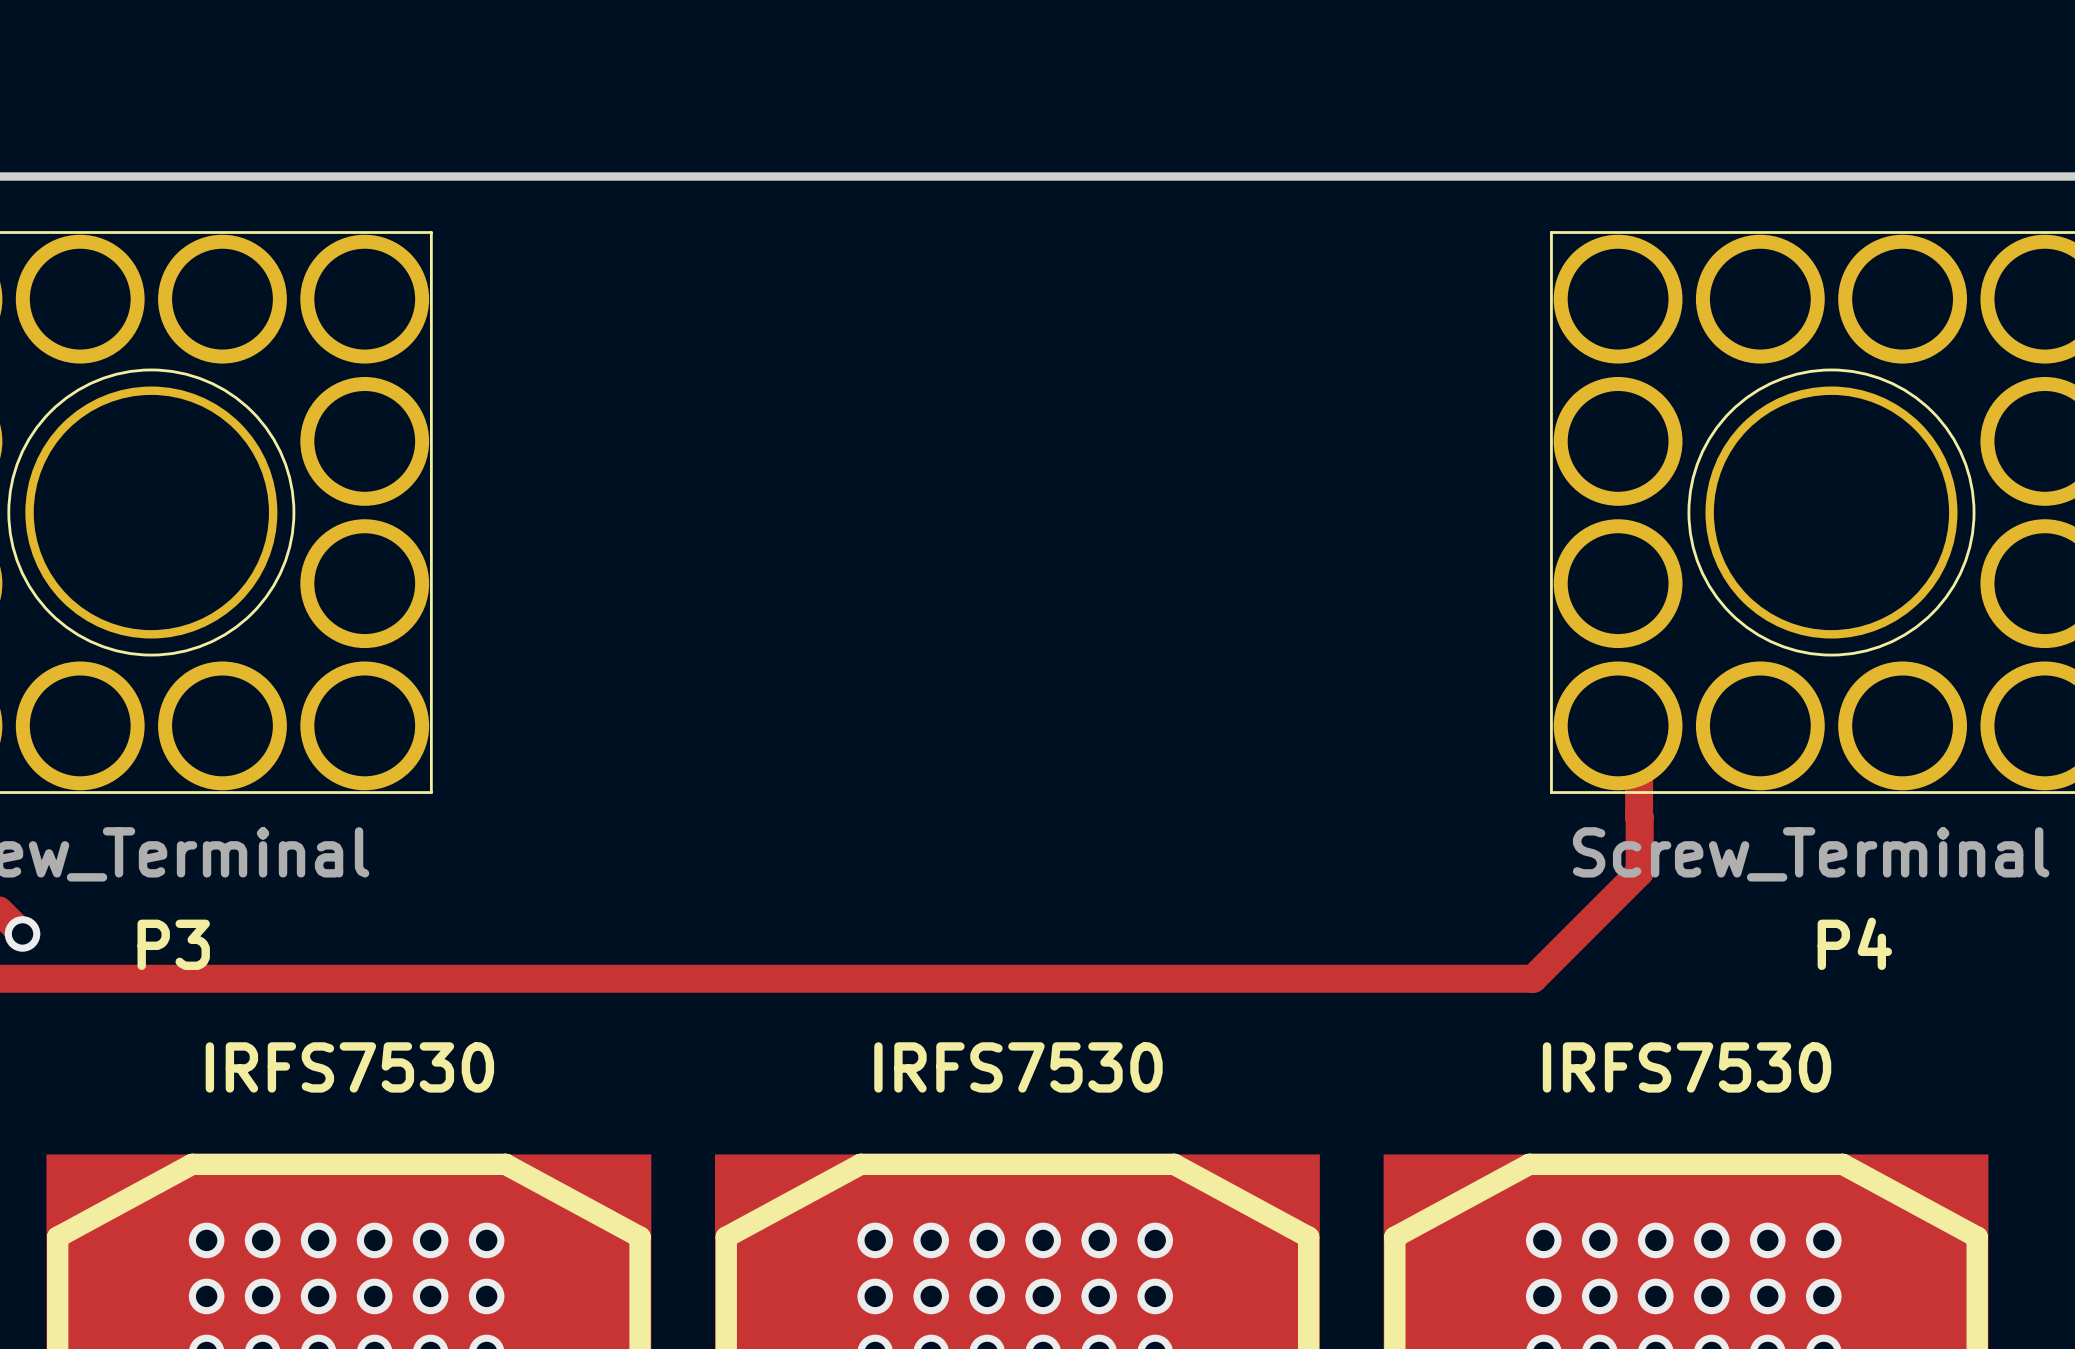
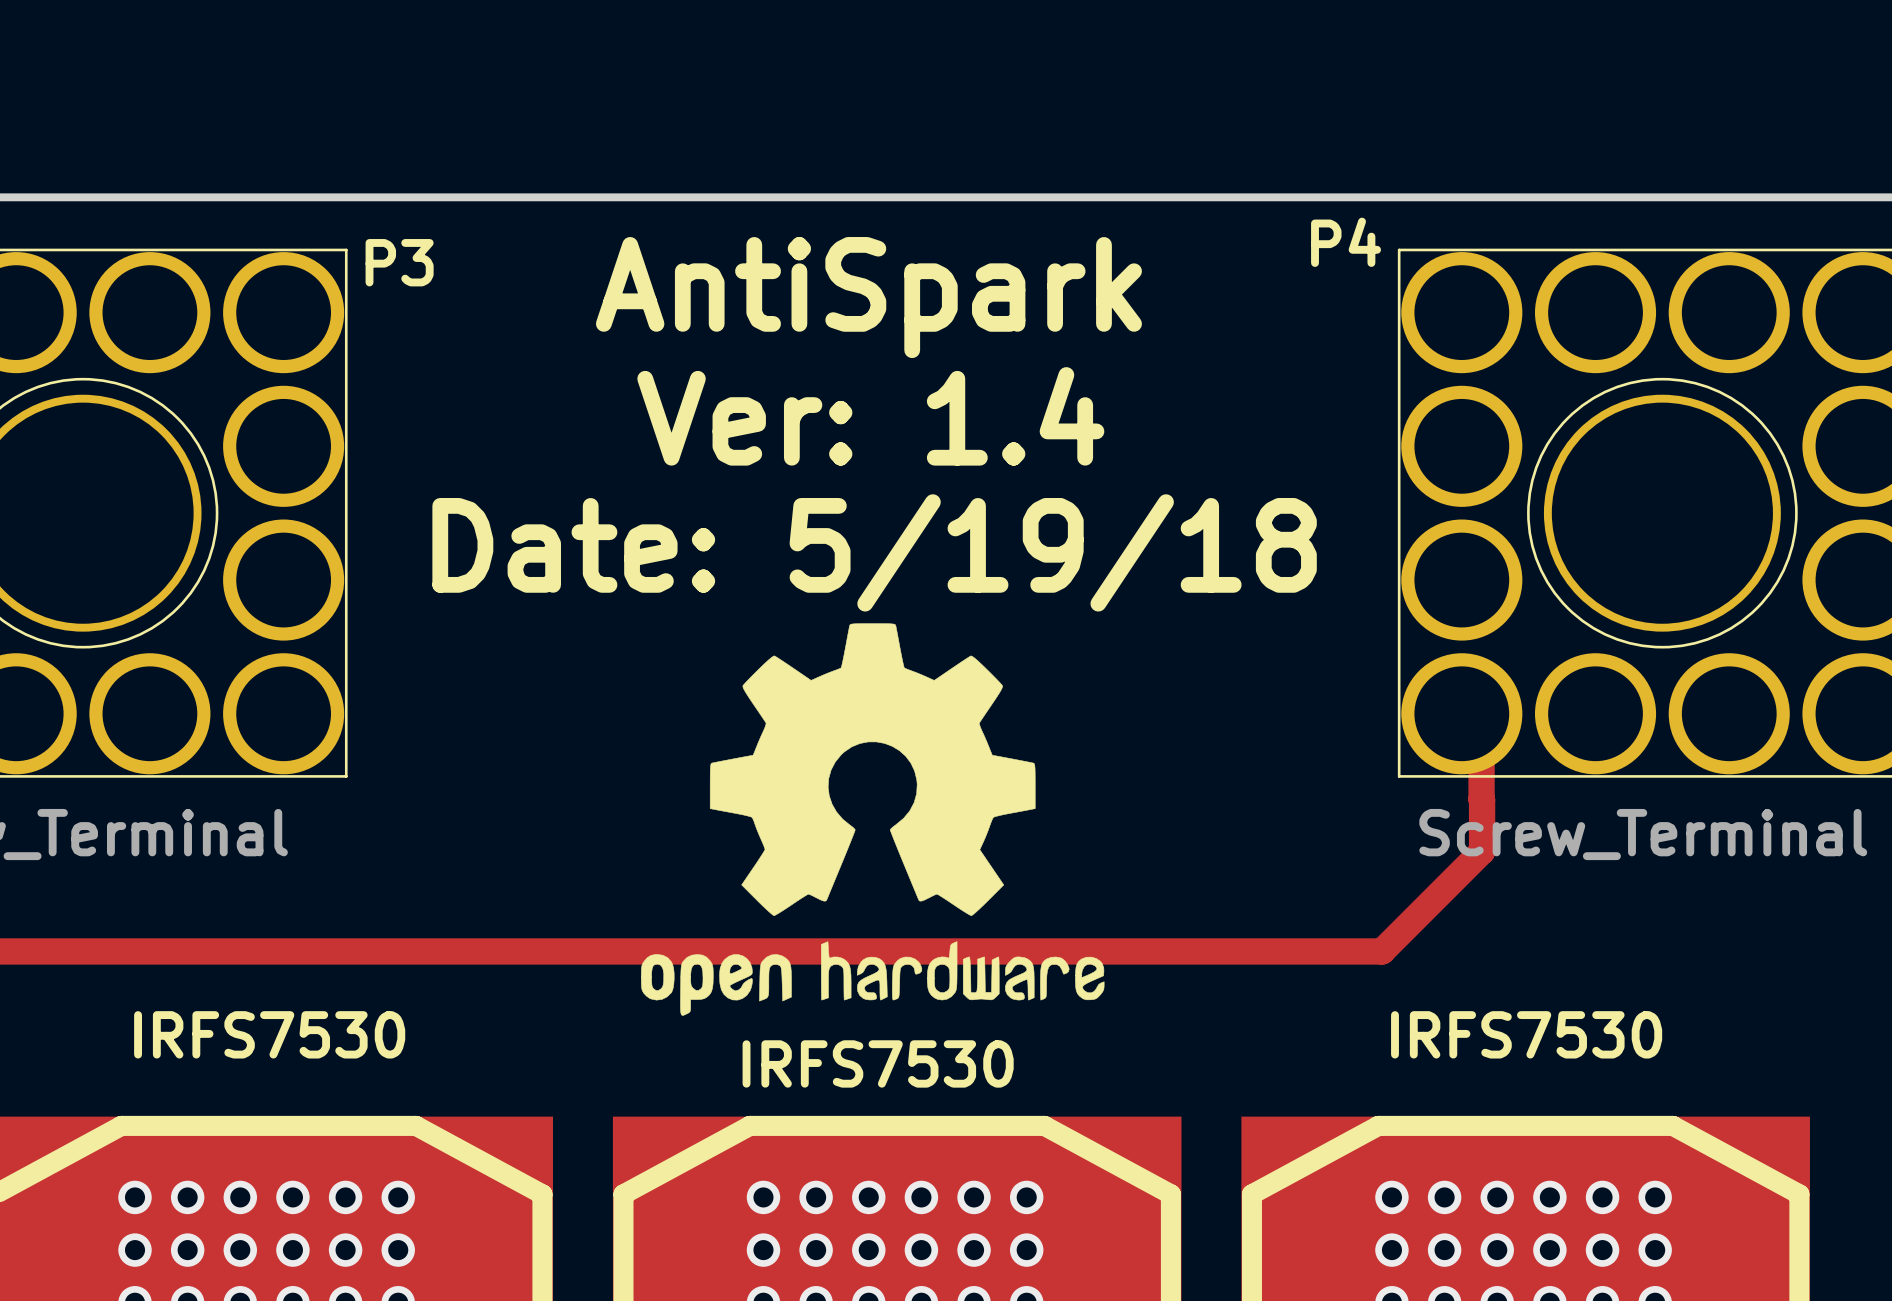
text: none -> AntiSpark (868, 297)
text: none -> Ver: 1.4 (870, 416)
text: none -> Date: 5/19/18 (874, 552)
drawing: none -> [641, 623, 1105, 1016]
P4 name position: P4 (1854, 943) -> P4 (1346, 242)
P3 name position: P3 (173, 944) -> P3 (399, 262)
part value position: IRFS7530 (1018, 1067) -> IRFS7530 (878, 1063)

